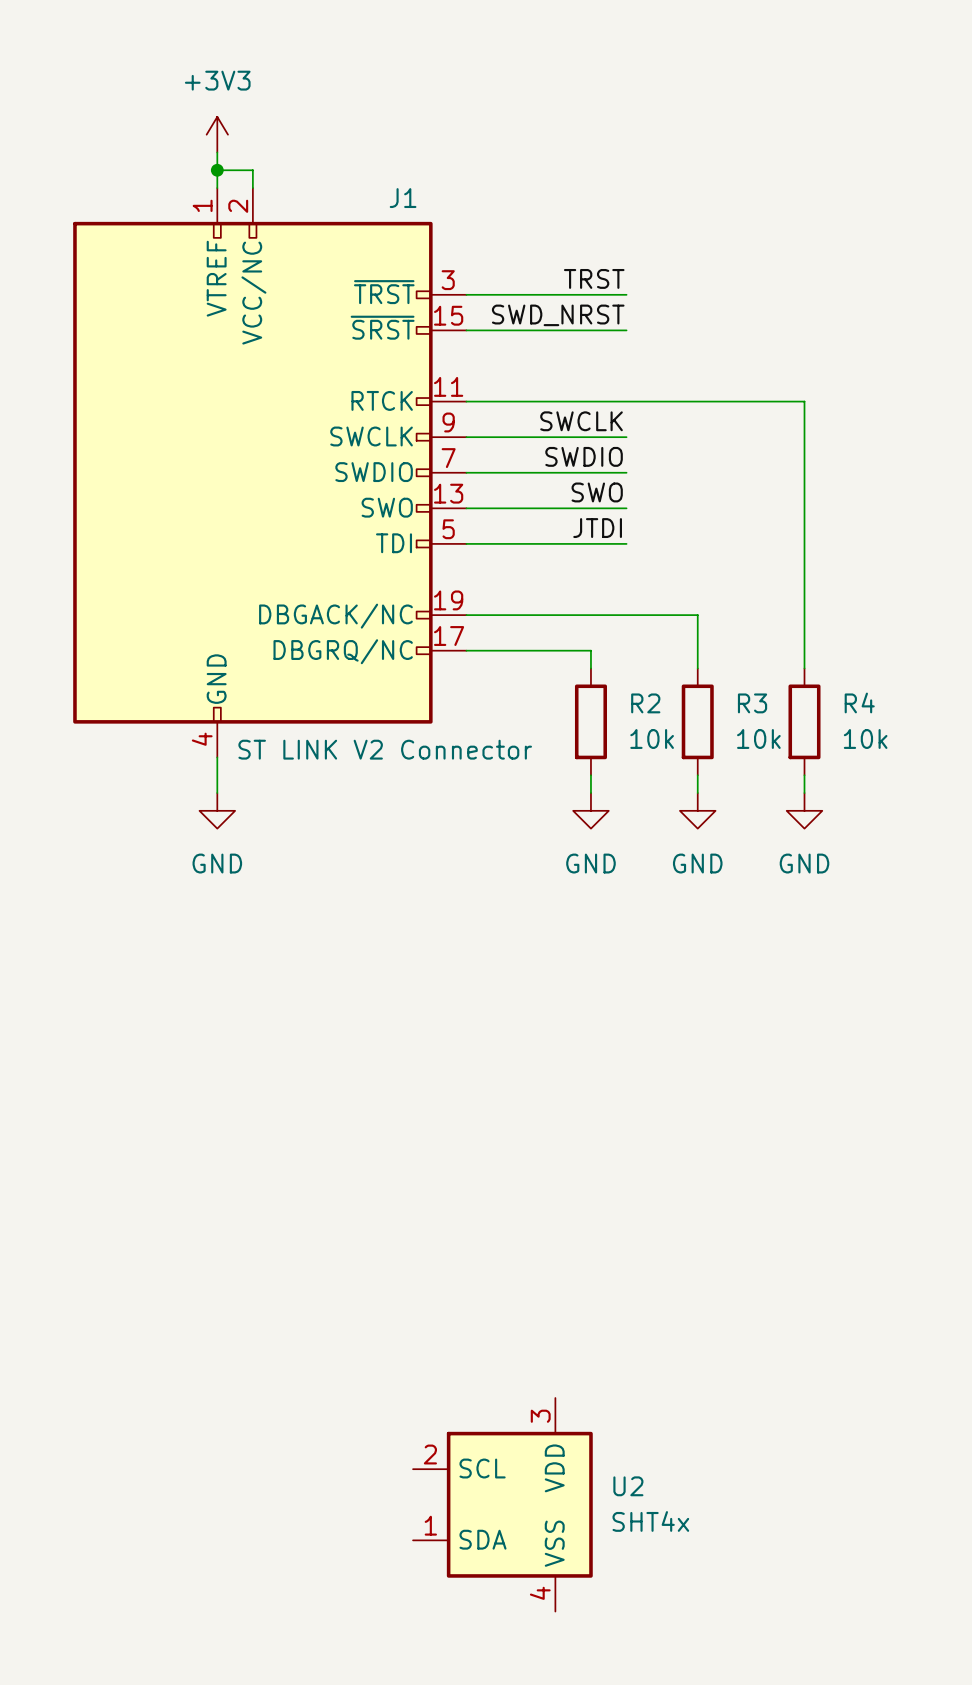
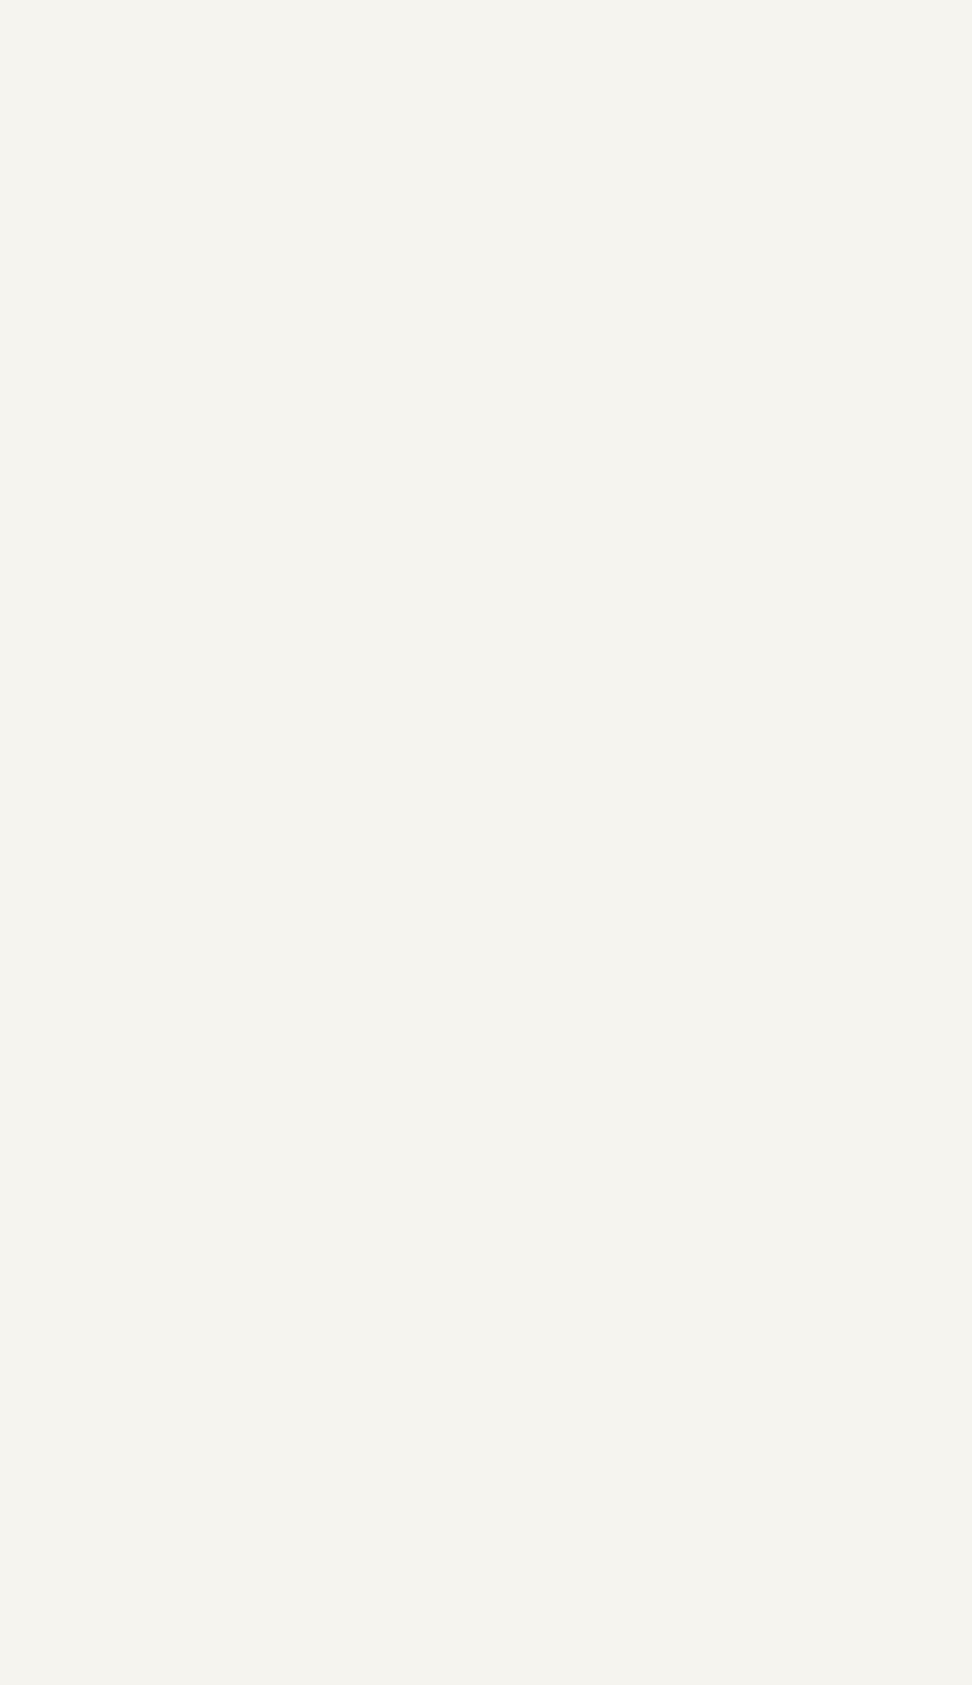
power symbol: +3V3 (217, 134) -> none
wire: (217, 152) (217, 188) -> none
wire: (217, 170) (252, 170) (252, 188) -> none
junction: (217, 170) -> none
label: TRST (594, 278) -> none
wire: (466, 294) (626, 294) -> none
label: SWD_NRST (558, 315) -> none
wire: (466, 330) (626, 330) -> none
wire: (466, 401) (804, 401) (804, 668) -> none
label: SWCLK (581, 421) -> none
wire: (466, 437) (626, 437) -> none
label: SWDIO (584, 456) -> none
J1: ST LINK V2 Connector (269, 472) -> none
wire: (466, 472) (626, 472) -> none
label: SWO (597, 492) -> none
wire: (466, 508) (626, 508) -> none
label: JTDI (597, 528) -> none
wire: (466, 543) (626, 543) -> none
wire: (466, 615) (697, 615) (697, 668) -> none
wire: (466, 650) (590, 650) (590, 668) -> none
R2: 10k (590, 721) -> none
R3: 10k (697, 721) -> none
R4: 10k (804, 721) -> none
wire: (217, 757) (217, 793) -> none
wire: (590, 775) (590, 793) -> none
wire: (697, 775) (697, 793) -> none
wire: (804, 775) (804, 793) -> none
power symbol: GND (217, 810) -> none
power symbol: GND (590, 810) -> none
power symbol: GND (697, 810) -> none
power symbol: GND (804, 810) -> none
U2: SHT4x (502, 1504) -> none

